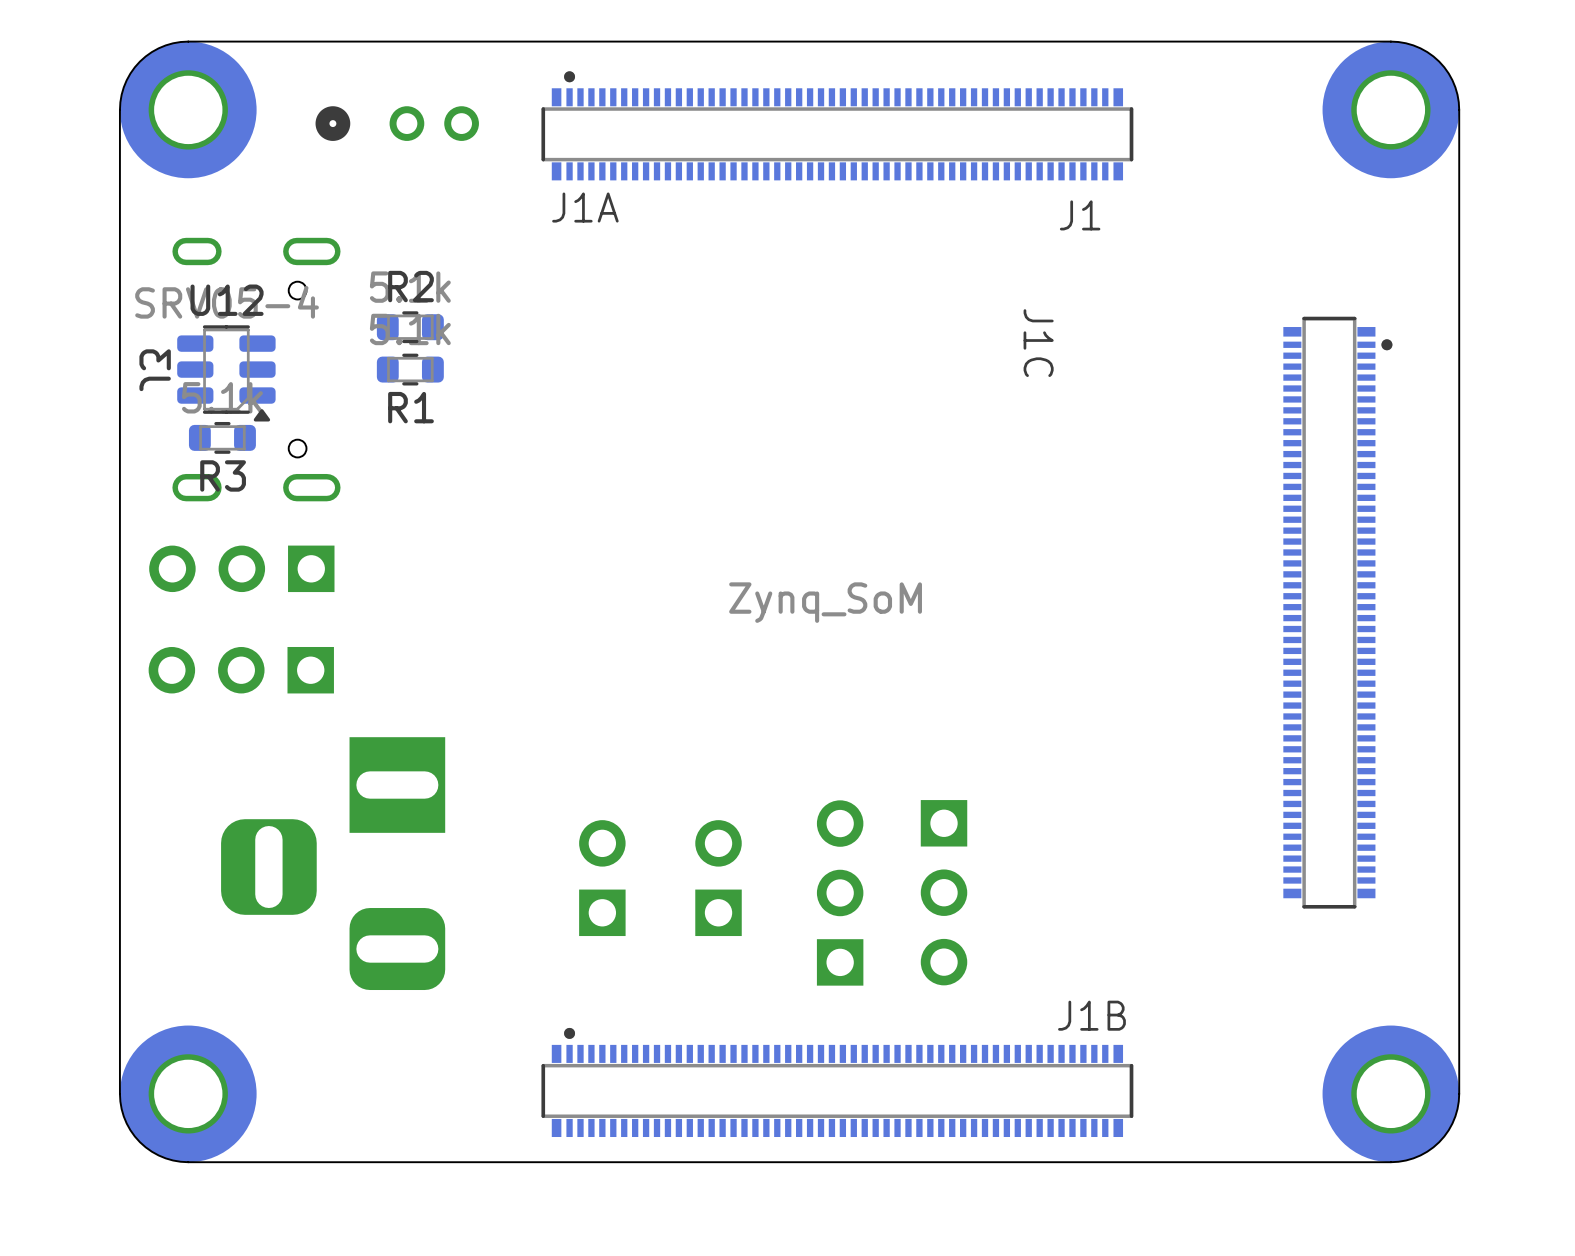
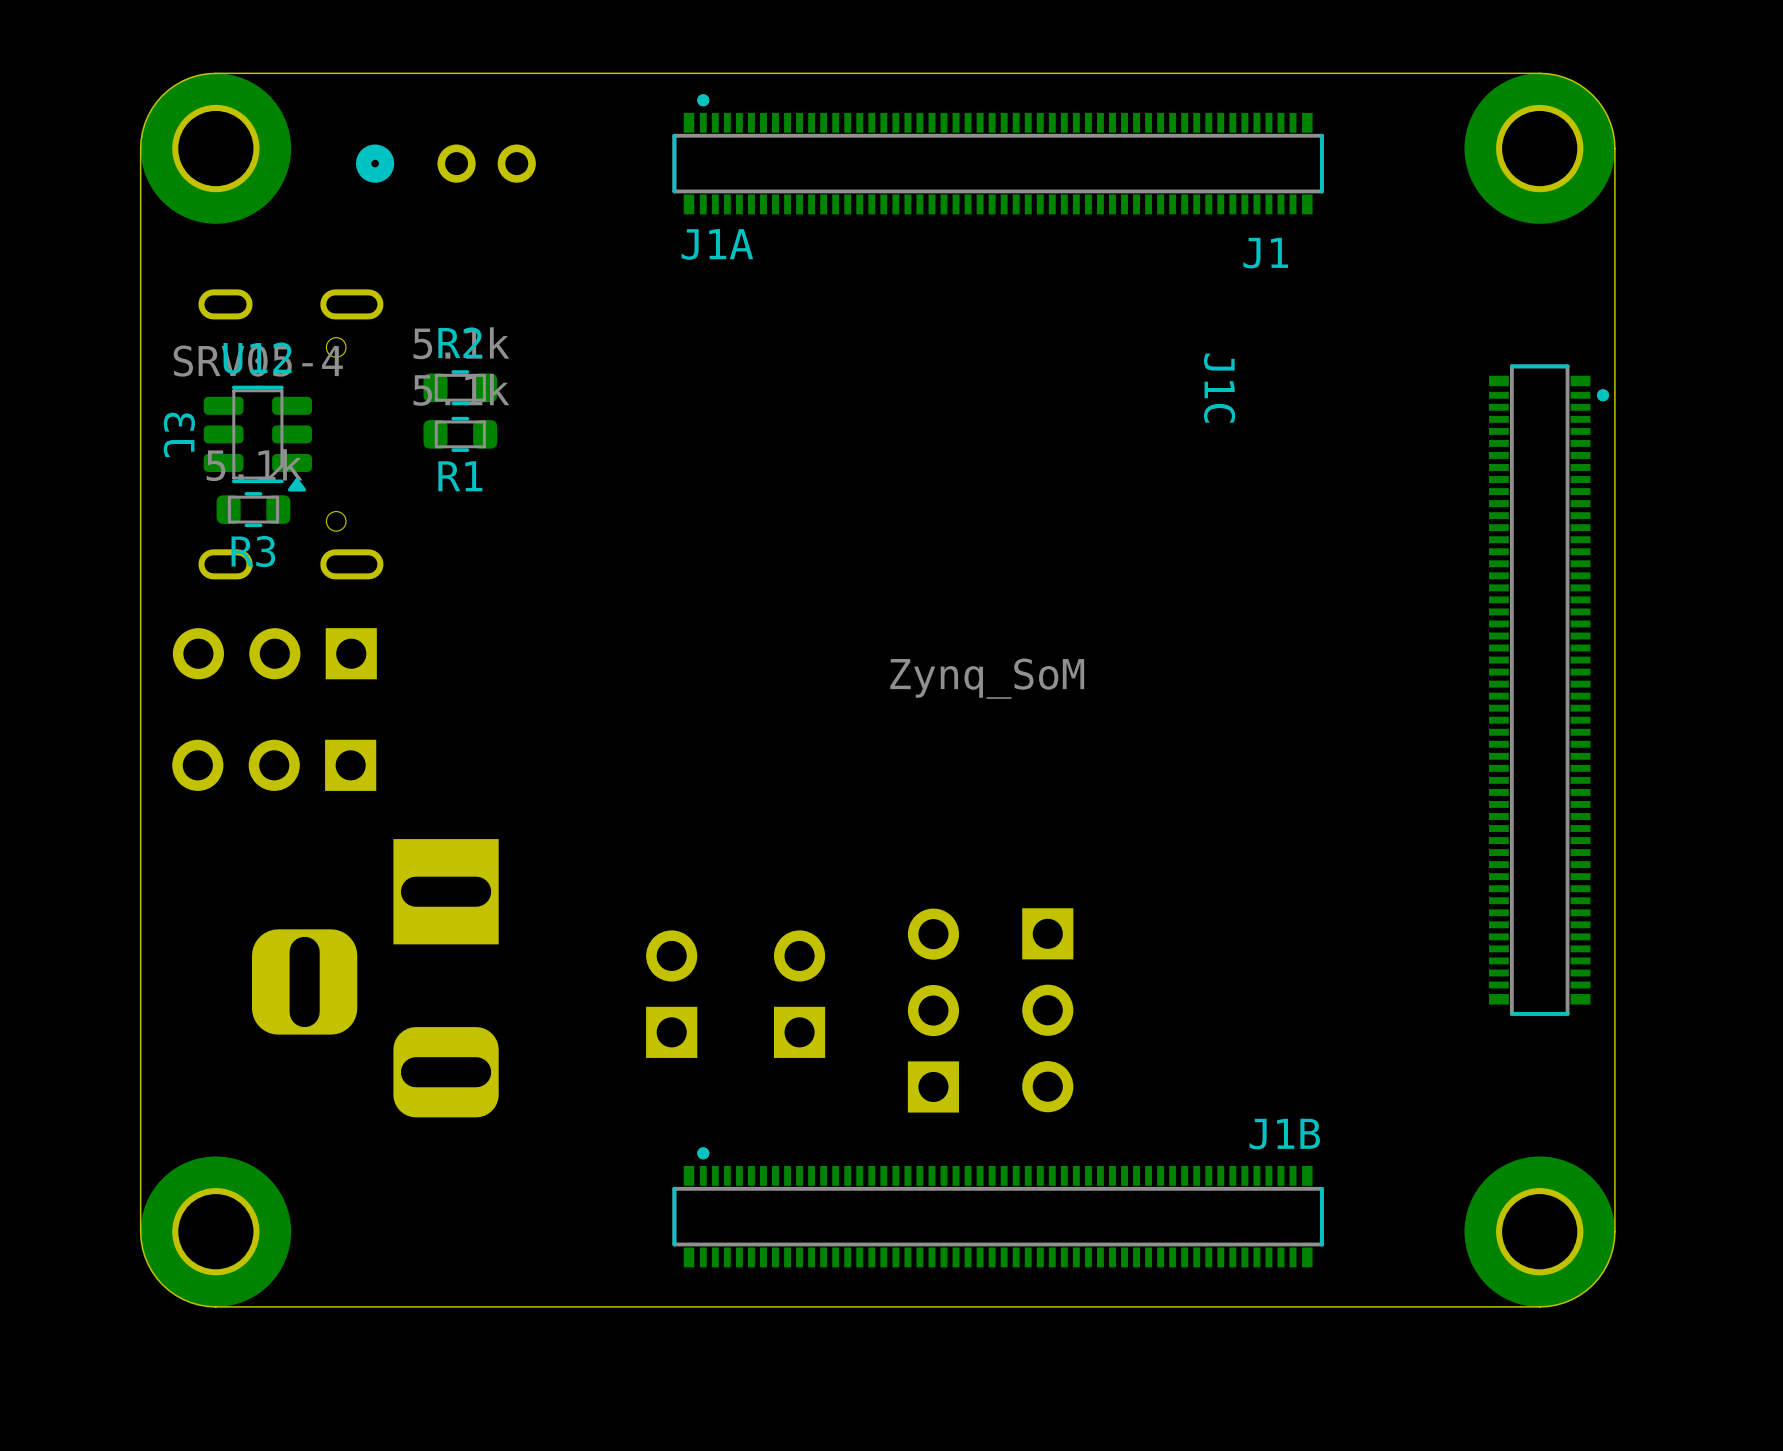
J1 position: (966, 604) -> (1140, 680)

